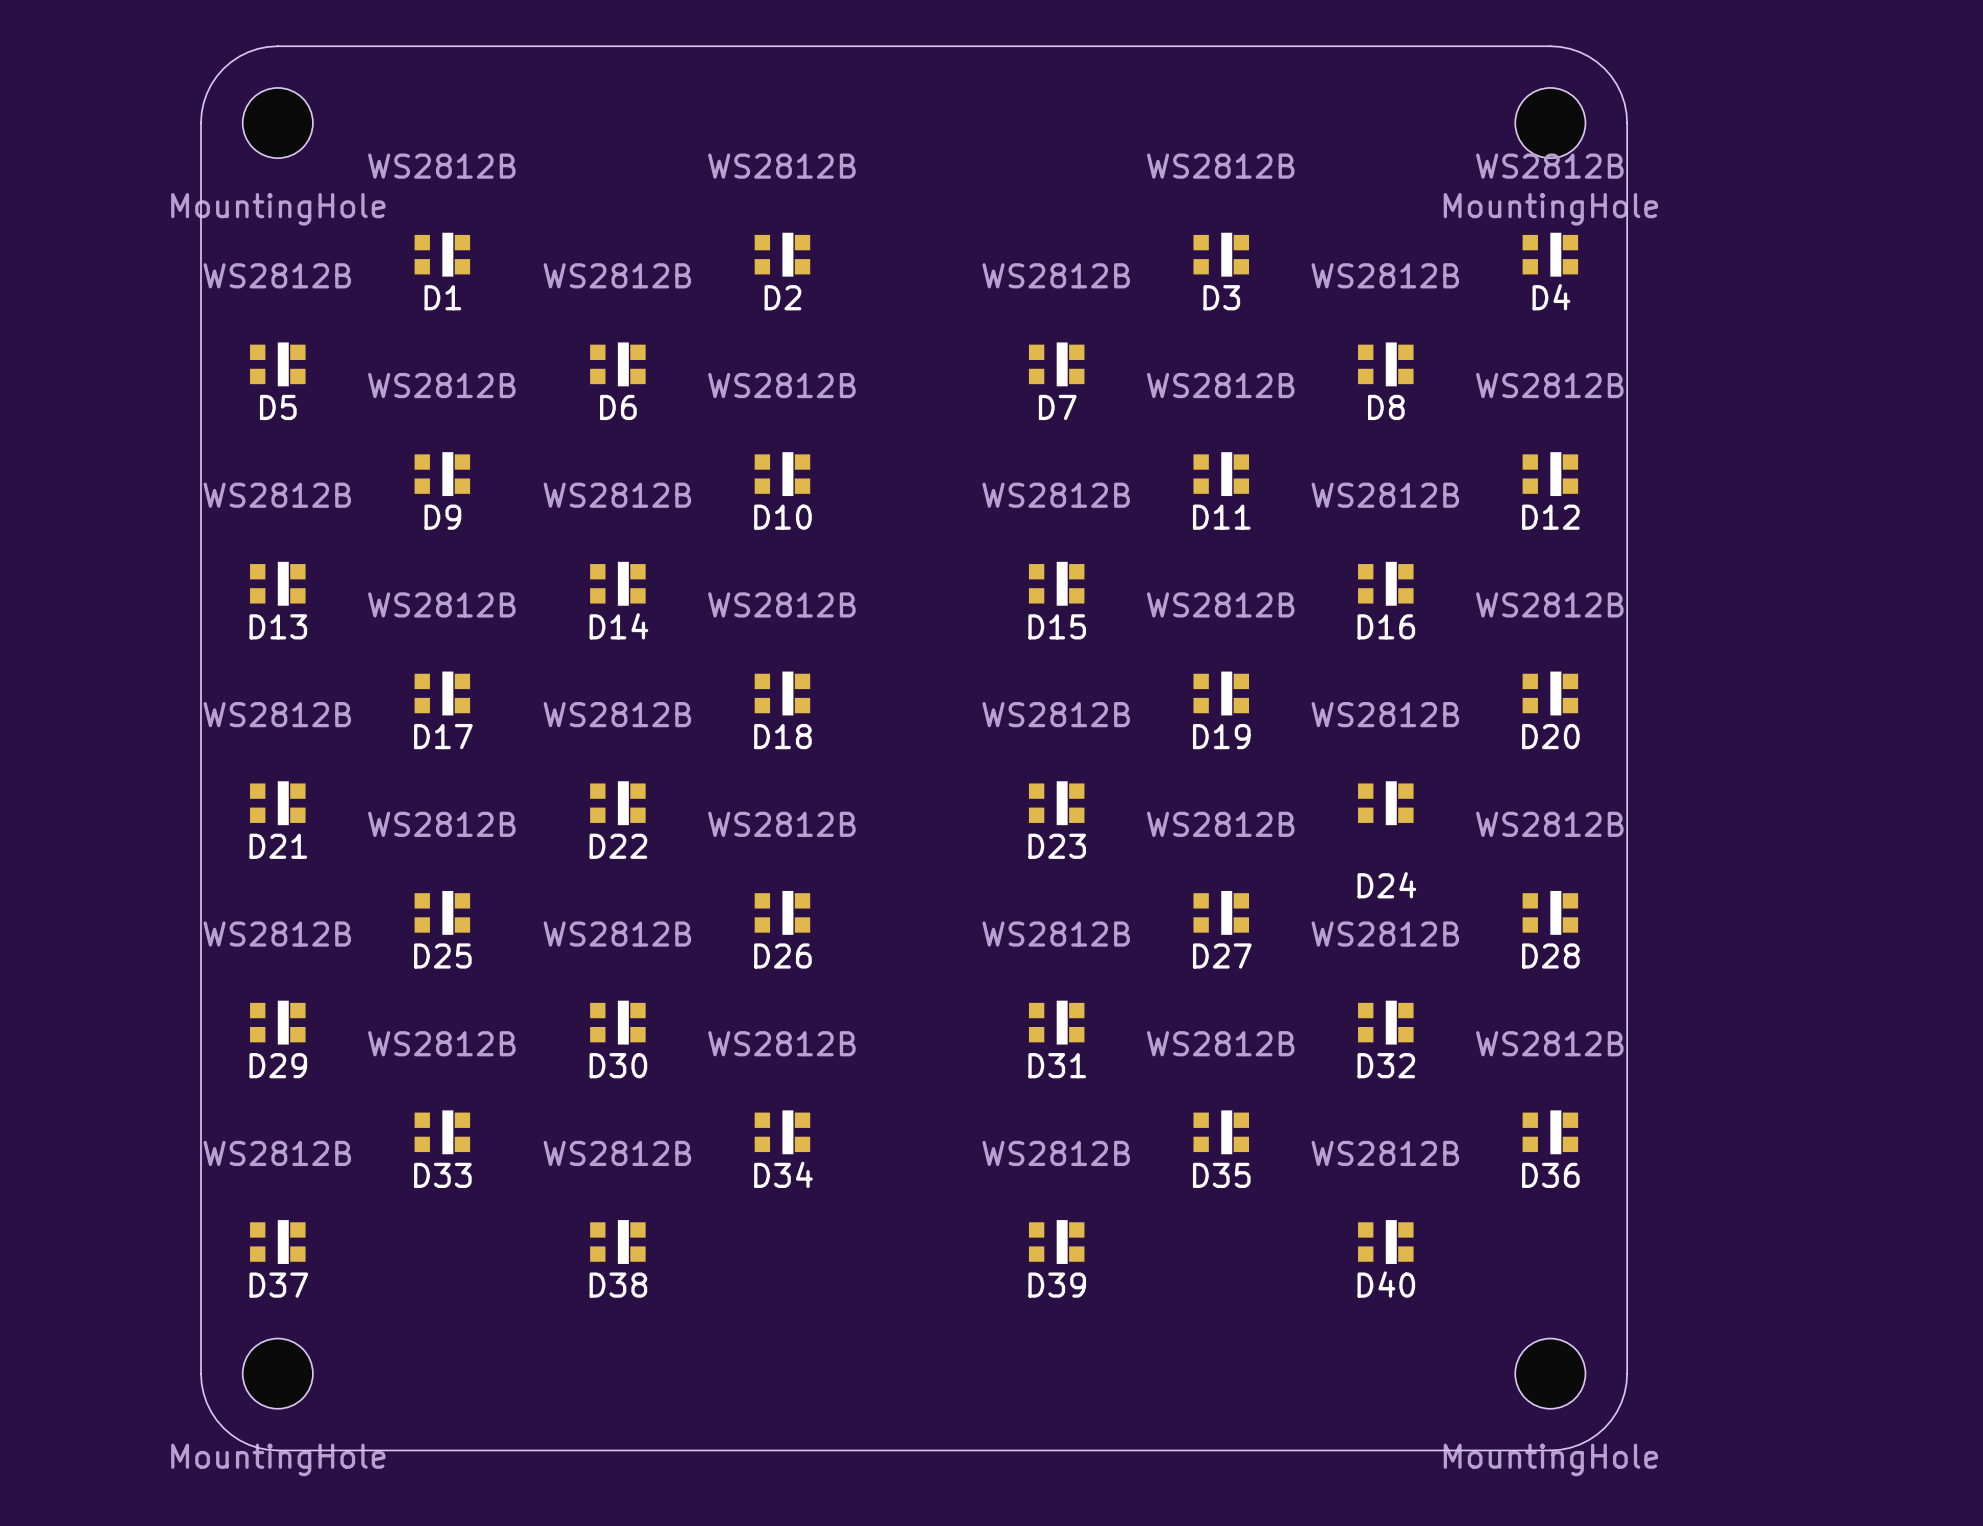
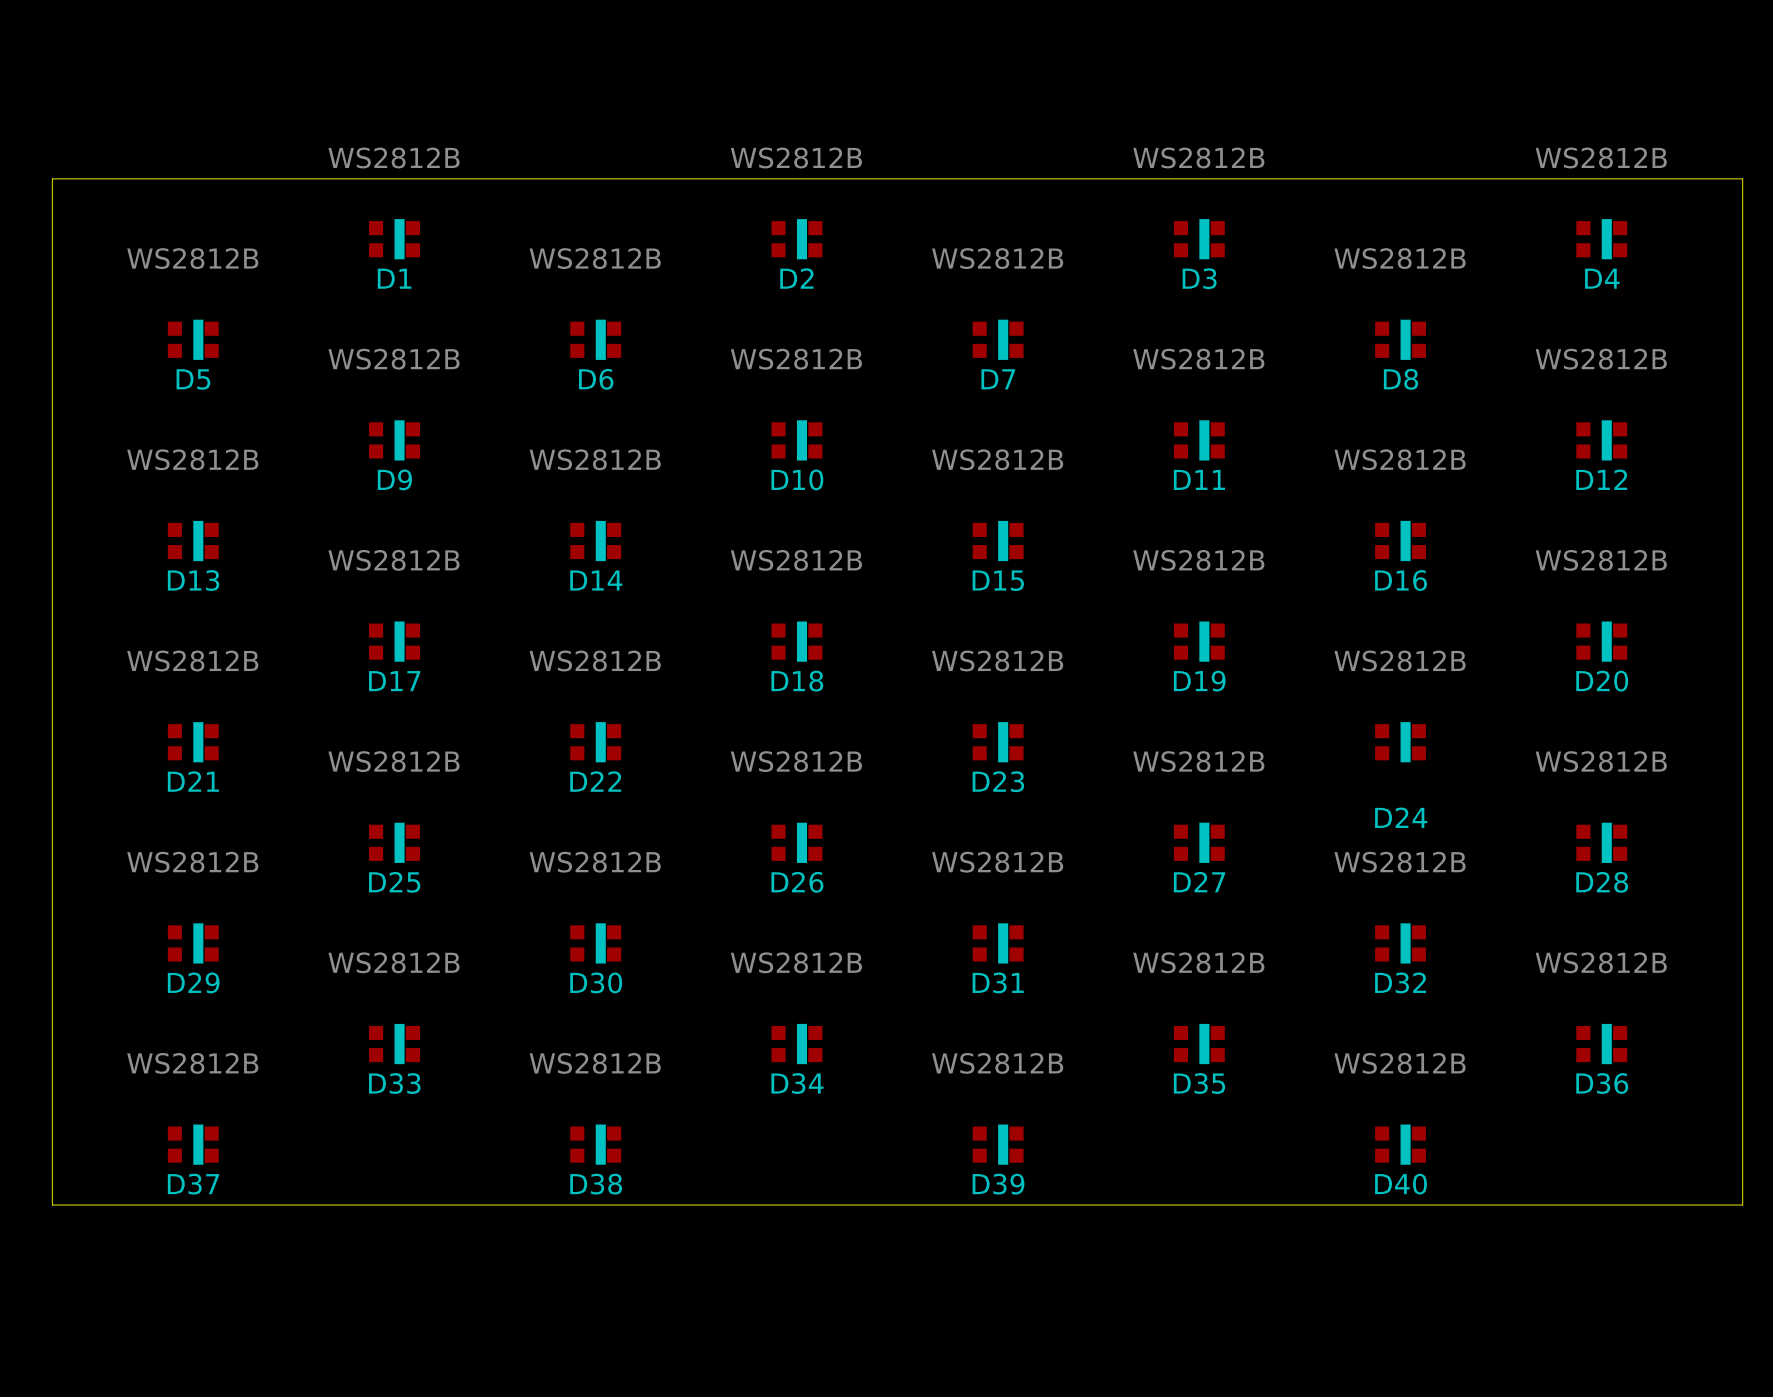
board edge: (277, 46) (1550, 46) (1579, 52) (1604, 68) (1621, 93) (1627, 123) (1627, 1373) (1621, 1403) (1604, 1427) (1579, 1444) (1550, 1450) (277, 1450) (248, 1444) (223, 1427) (206, 1403) (201, 1373) (201, 123) (206, 93) (223, 68) (248, 52) (277, 46) -> (52, 178) (52, 1205) (1742, 1205) (1742, 178) (52, 178)
part: MountingHole (277, 123) -> none
part: MountingHole (1550, 123) -> none
D2 position: (782, 254) -> (796, 239)
D3 position: (1221, 254) -> (1199, 239)
D4 position: (1550, 254) -> (1601, 239)
D5 position: (277, 364) -> (193, 339)
D6 position: (617, 364) -> (595, 339)
D7 position: (1056, 364) -> (998, 339)
D8 position: (1385, 364) -> (1400, 339)
D10 position: (782, 474) -> (796, 440)
D11 position: (1221, 474) -> (1199, 440)
D12 position: (1550, 474) -> (1601, 440)
D13 position: (277, 583) -> (193, 541)
D14 position: (617, 583) -> (595, 541)
D15 position: (1056, 583) -> (998, 541)
D16 position: (1385, 583) -> (1400, 541)
D18 position: (782, 693) -> (796, 641)
D19 position: (1221, 693) -> (1199, 641)
D20 position: (1550, 693) -> (1601, 641)
D21 position: (277, 803) -> (193, 742)
D22 position: (617, 803) -> (595, 742)
D23 position: (1056, 803) -> (998, 742)
D24 position: (1385, 803) -> (1400, 742)
D26 position: (782, 912) -> (796, 842)
D27 position: (1221, 912) -> (1199, 842)
D28 position: (1550, 912) -> (1601, 842)
D29 position: (277, 1022) -> (193, 943)
D30 position: (617, 1022) -> (595, 943)
D31 position: (1056, 1022) -> (998, 943)
D32 position: (1385, 1022) -> (1400, 943)
D34 position: (782, 1132) -> (796, 1044)
D35 position: (1221, 1132) -> (1199, 1044)
D36 position: (1550, 1132) -> (1601, 1044)
D37 position: (277, 1242) -> (193, 1144)
D38 position: (617, 1242) -> (595, 1144)
D39 position: (1056, 1242) -> (998, 1144)
D40 position: (1385, 1242) -> (1400, 1144)
part: MountingHole (277, 1373) -> none
part: MountingHole (1550, 1373) -> none

